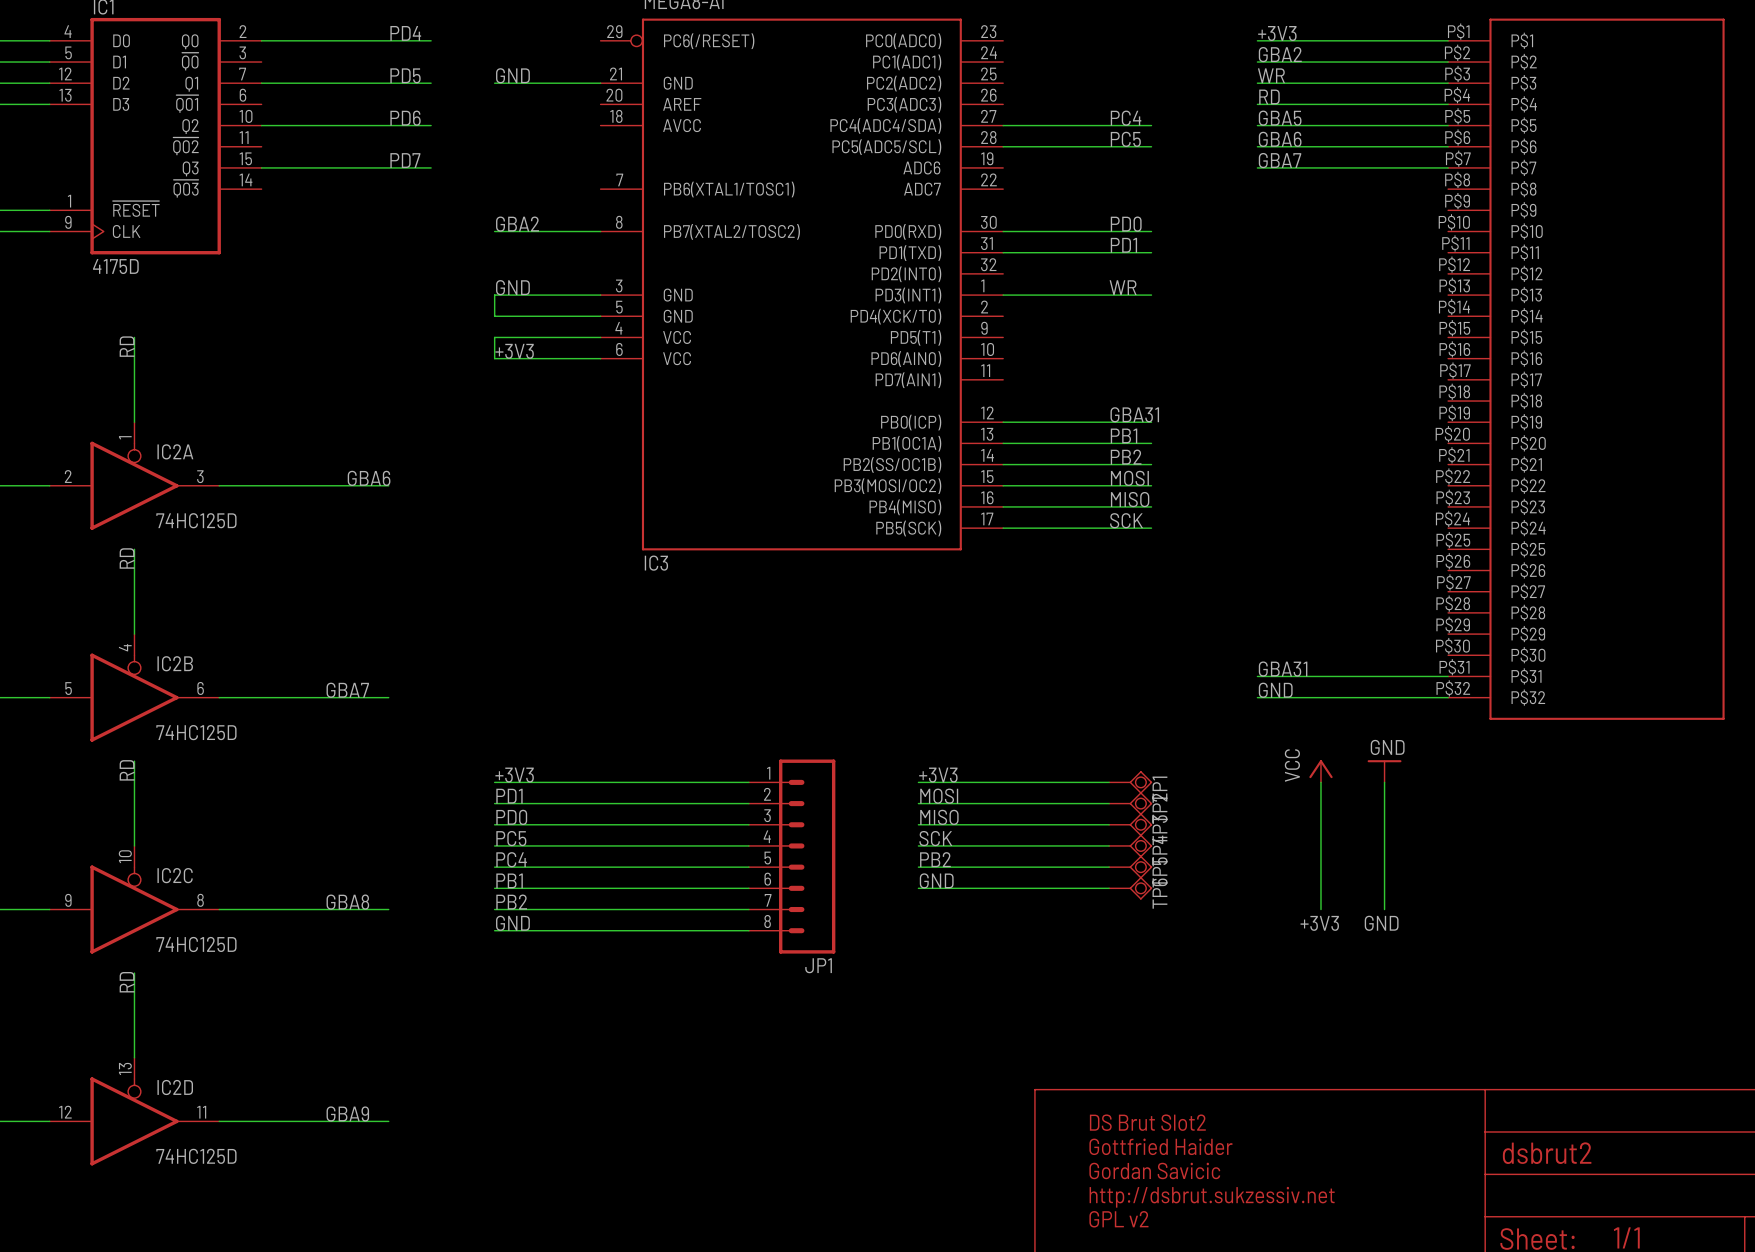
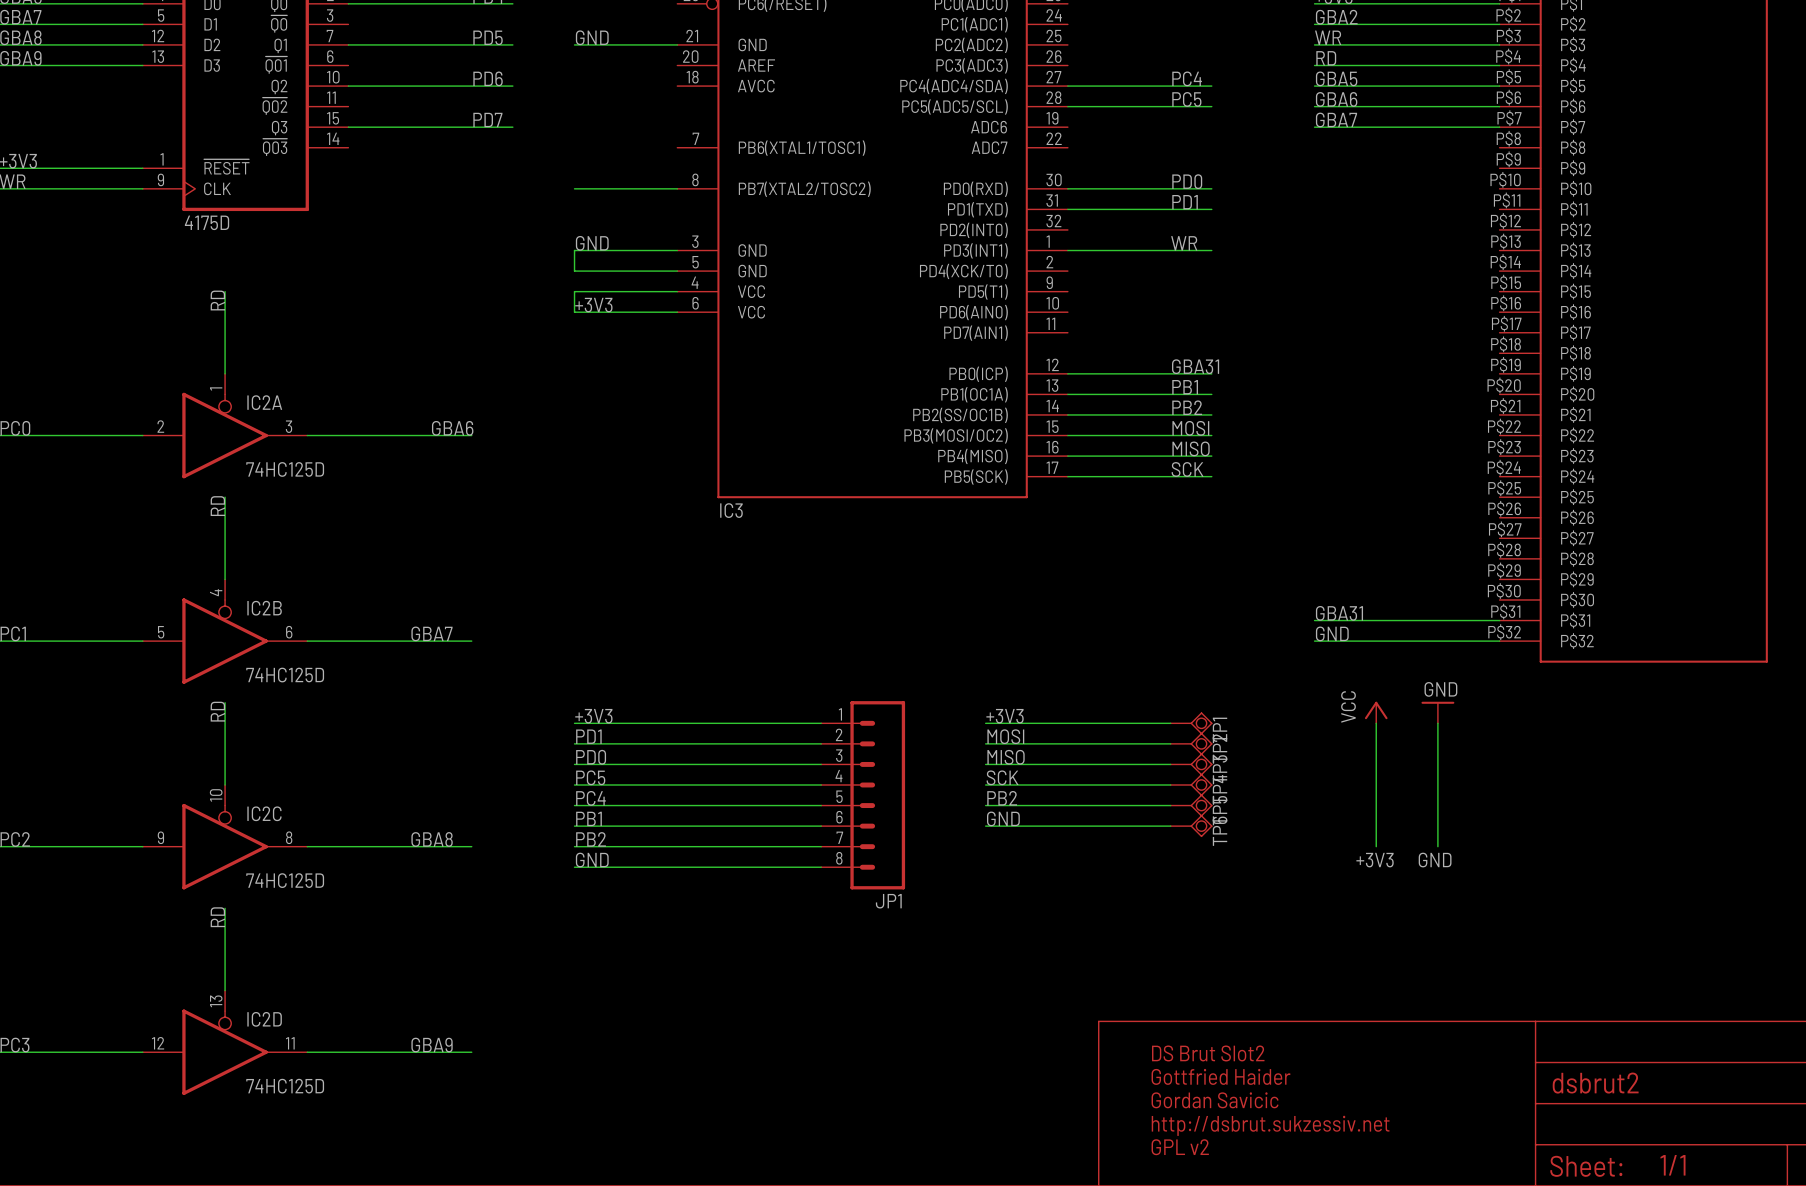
label: GBA2 (517, 224) -> none

